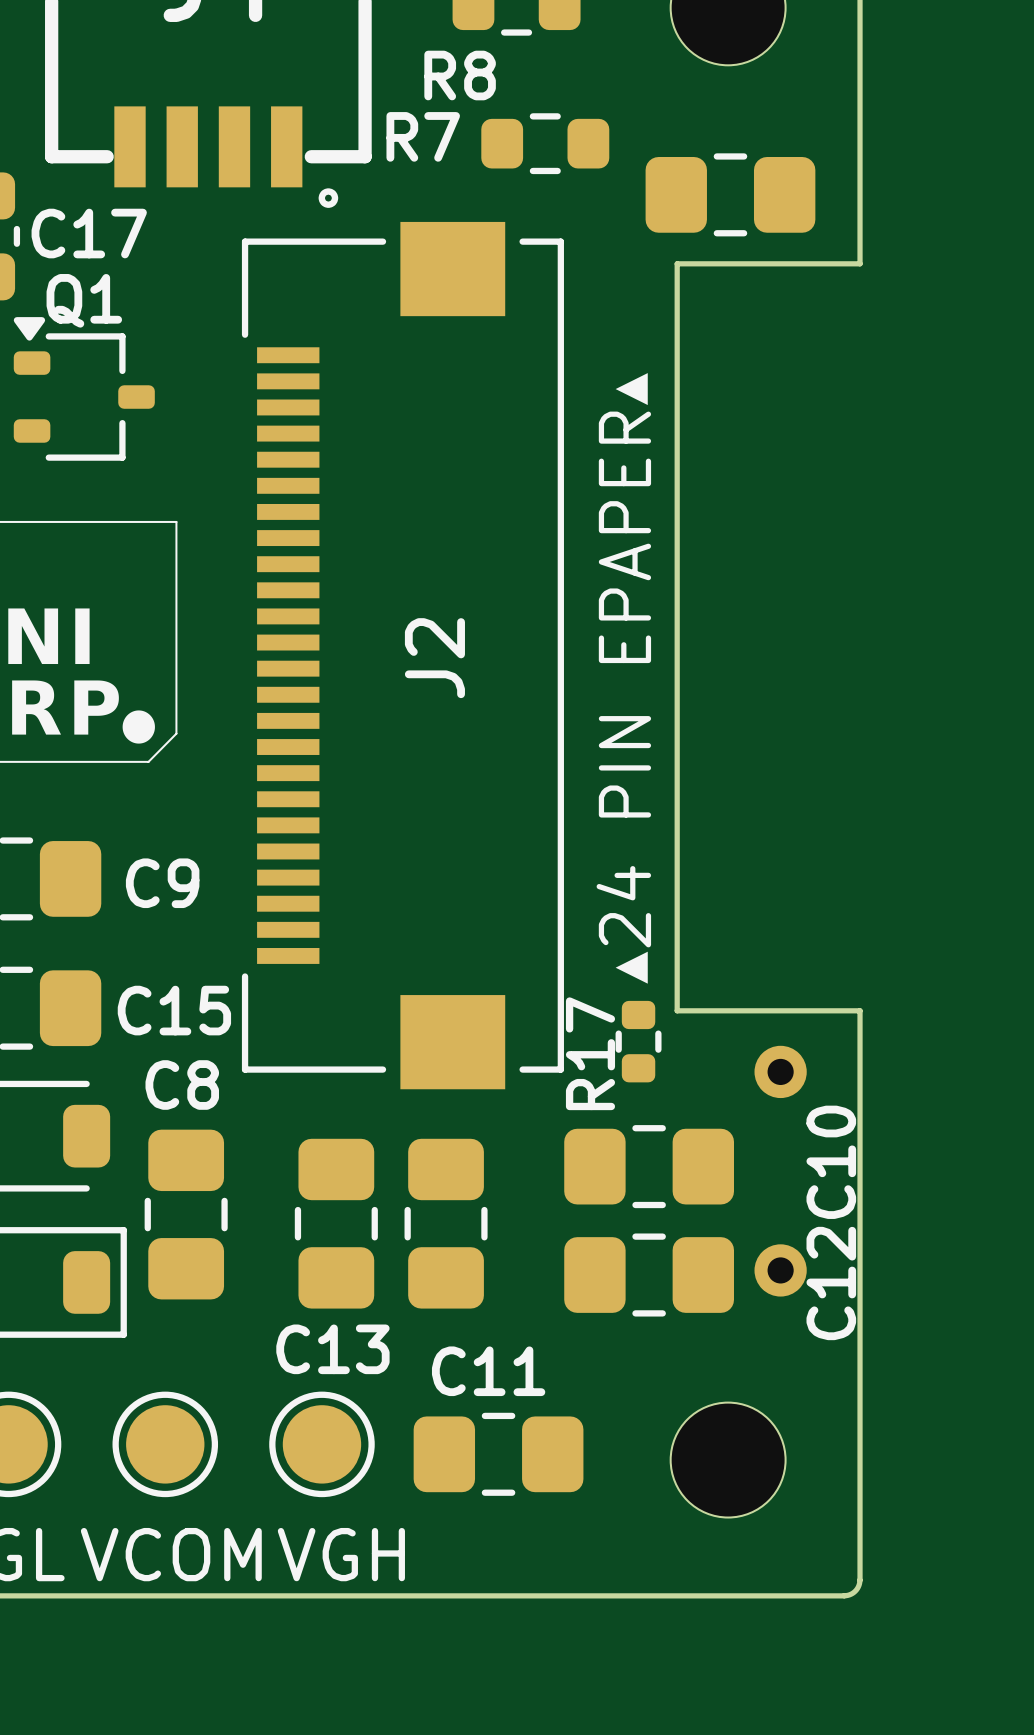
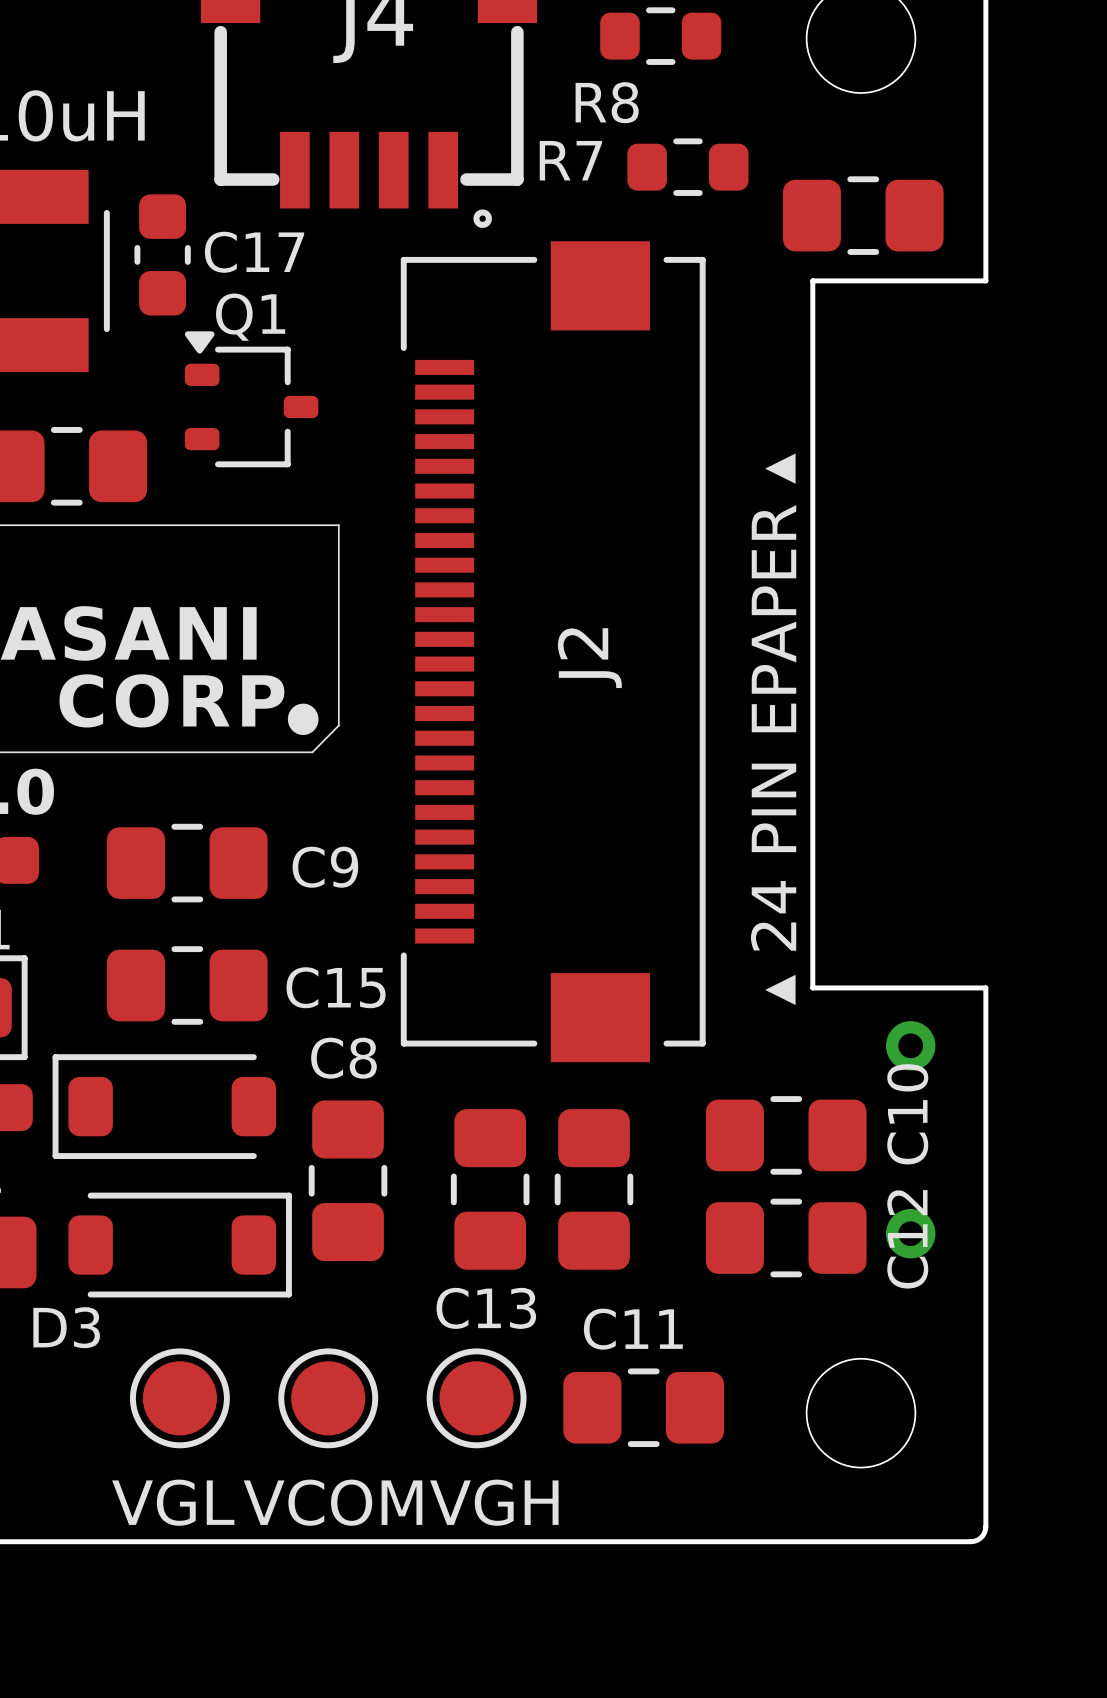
text: ▴24 PIN EPAPER▴ (623, 678) -> ▴ 24 PIN EPAPER ▴ (773, 729)
R17: (638, 1041) -> none
C10 name position: C10 (831, 1162) -> C10 (907, 1114)
C12 name position: C12 (831, 1283) -> C12 (907, 1239)

